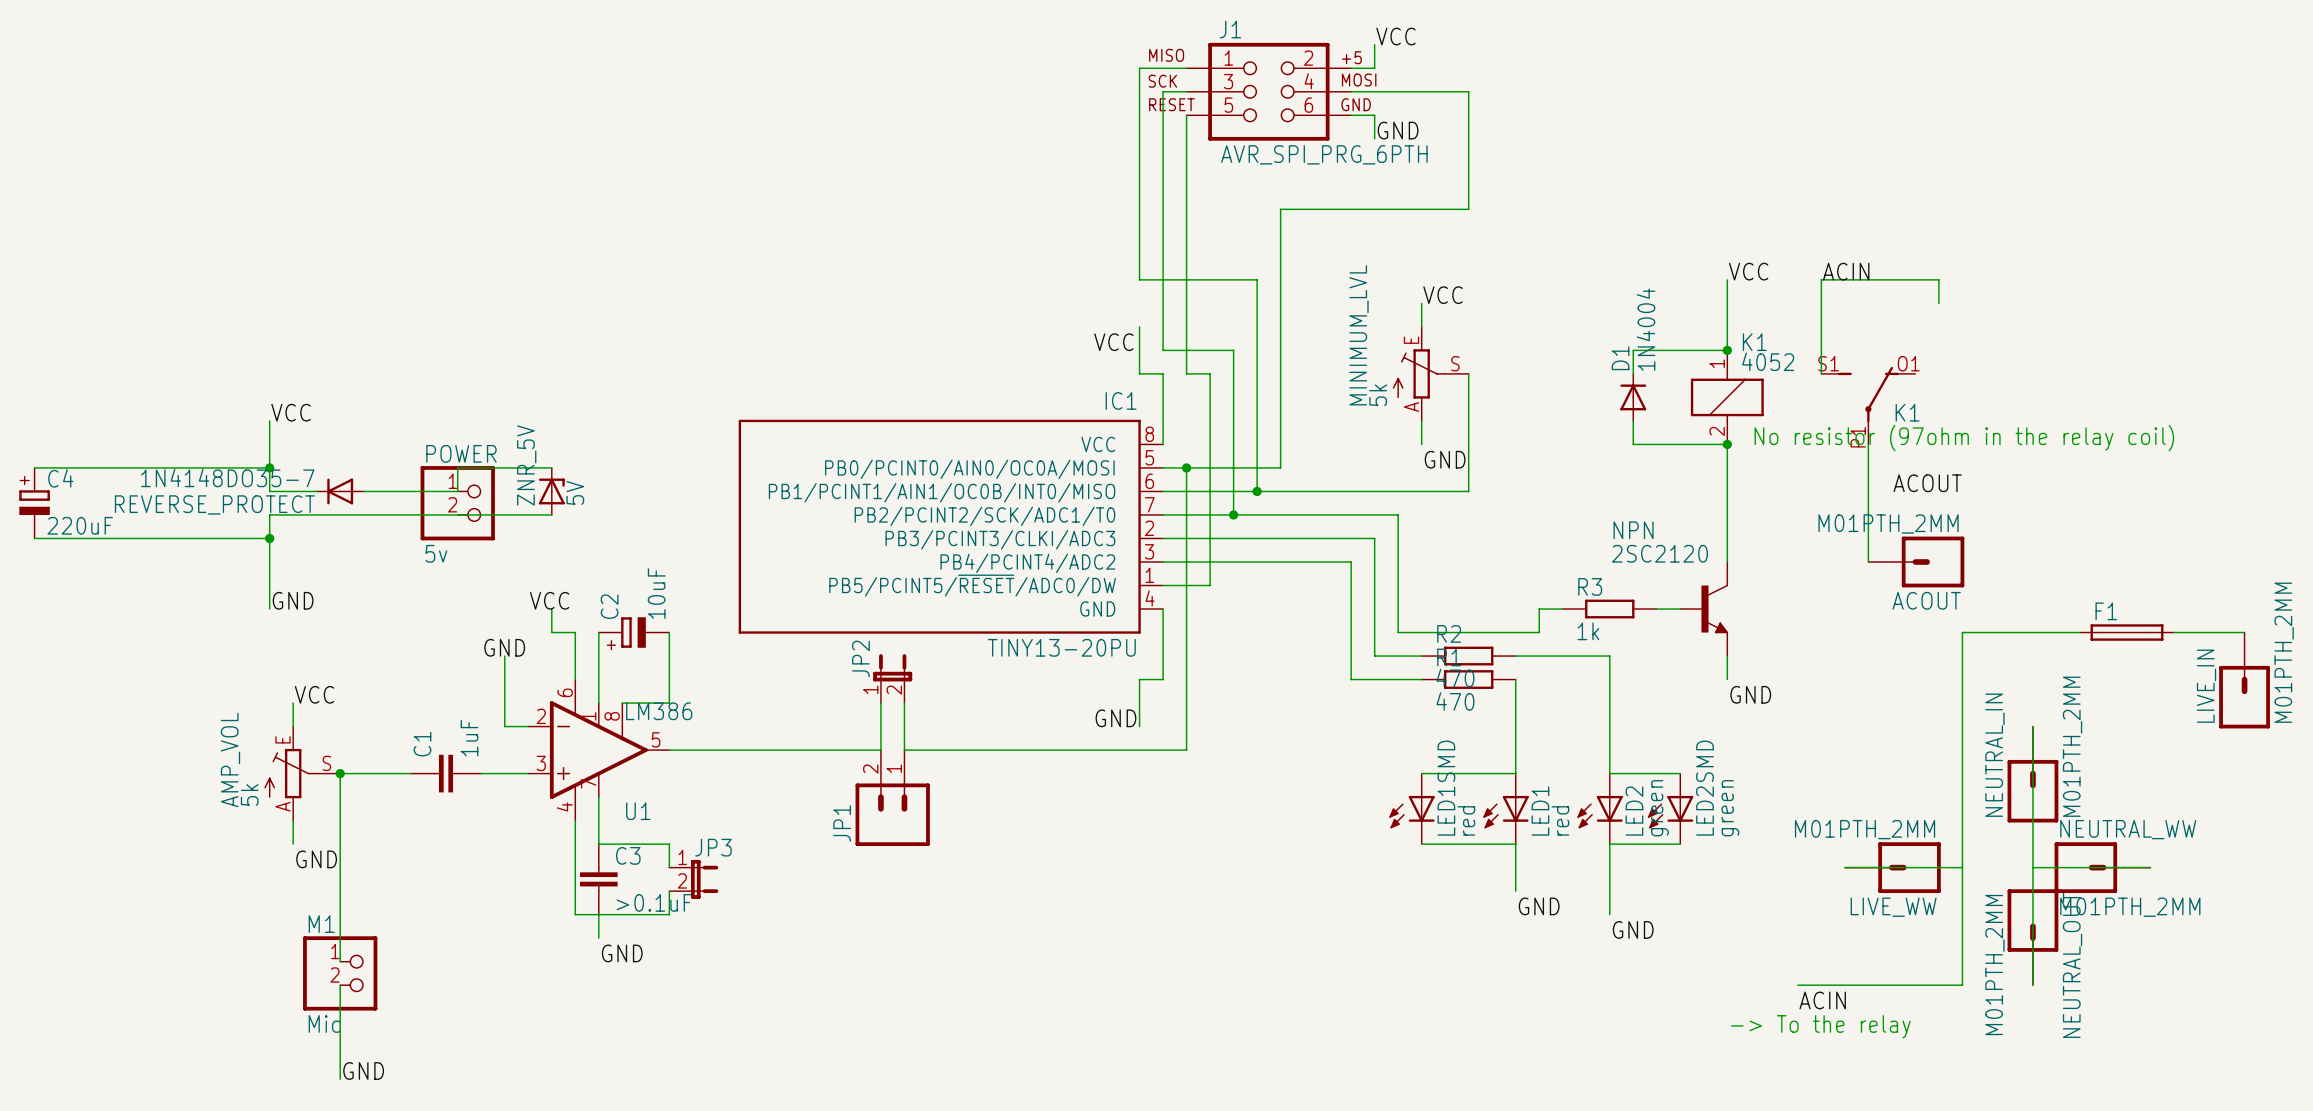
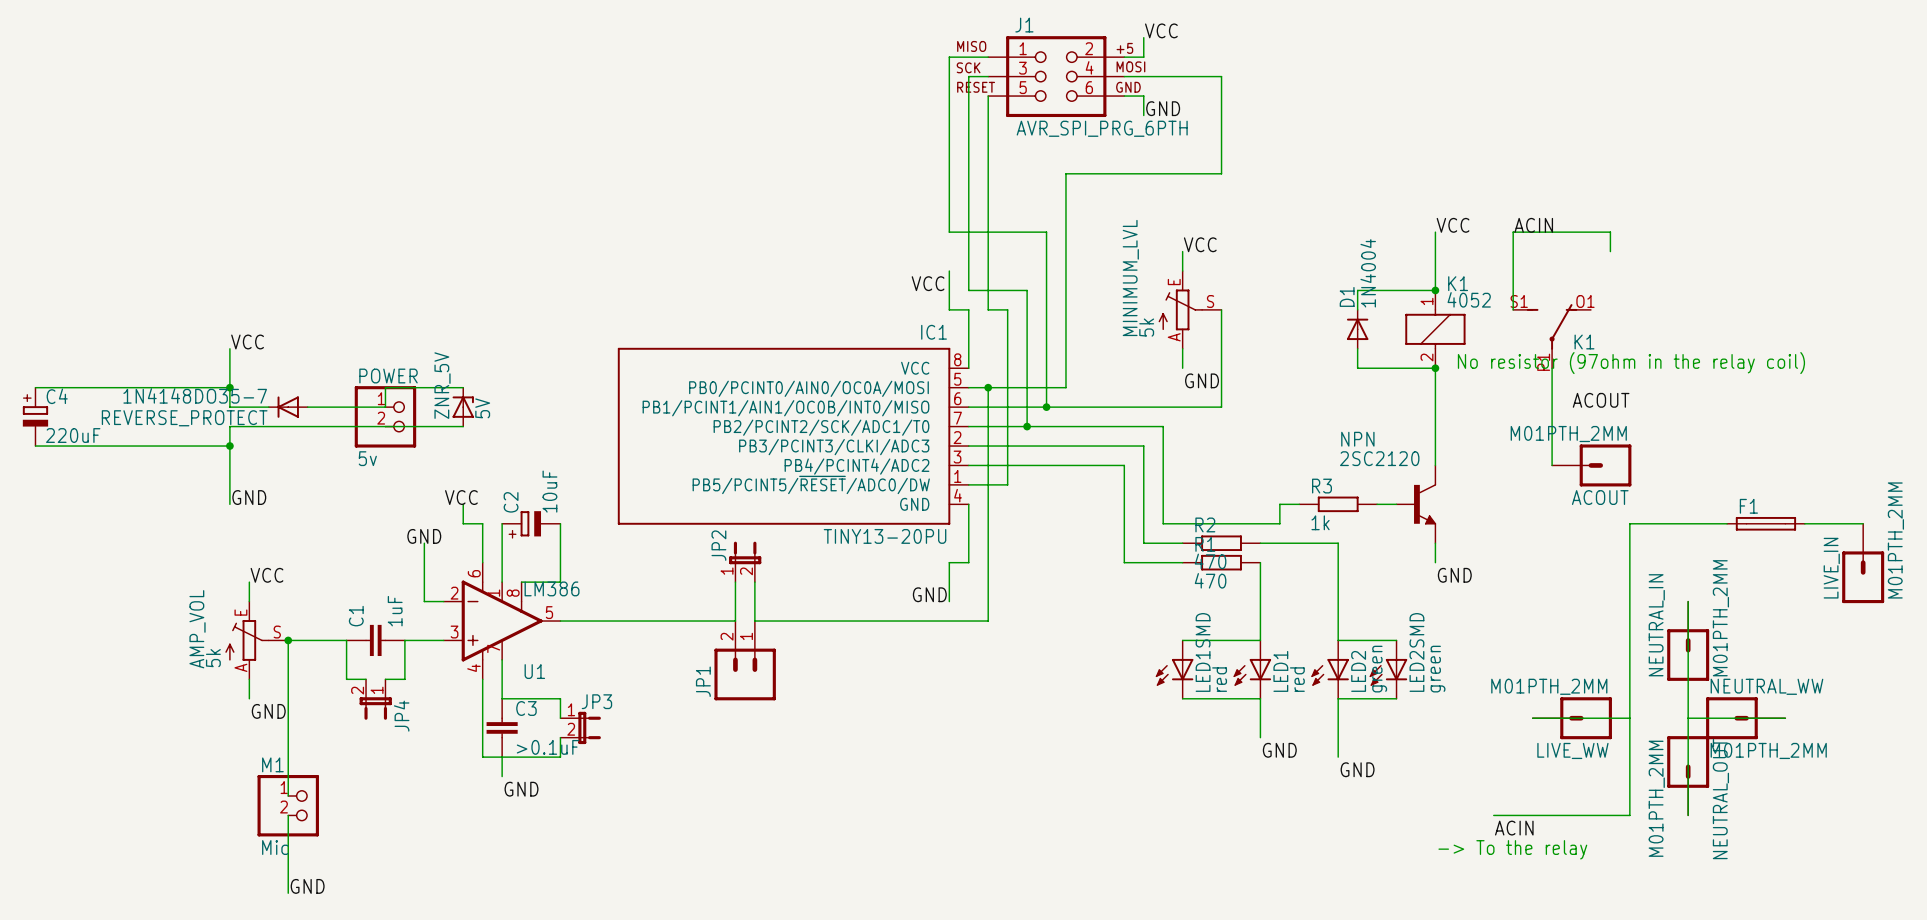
wire: none -> (346, 640) (346, 679) (366, 679)
wire: none -> (404, 640) (404, 679) (385, 679)
JP4: none -> (375, 699)

